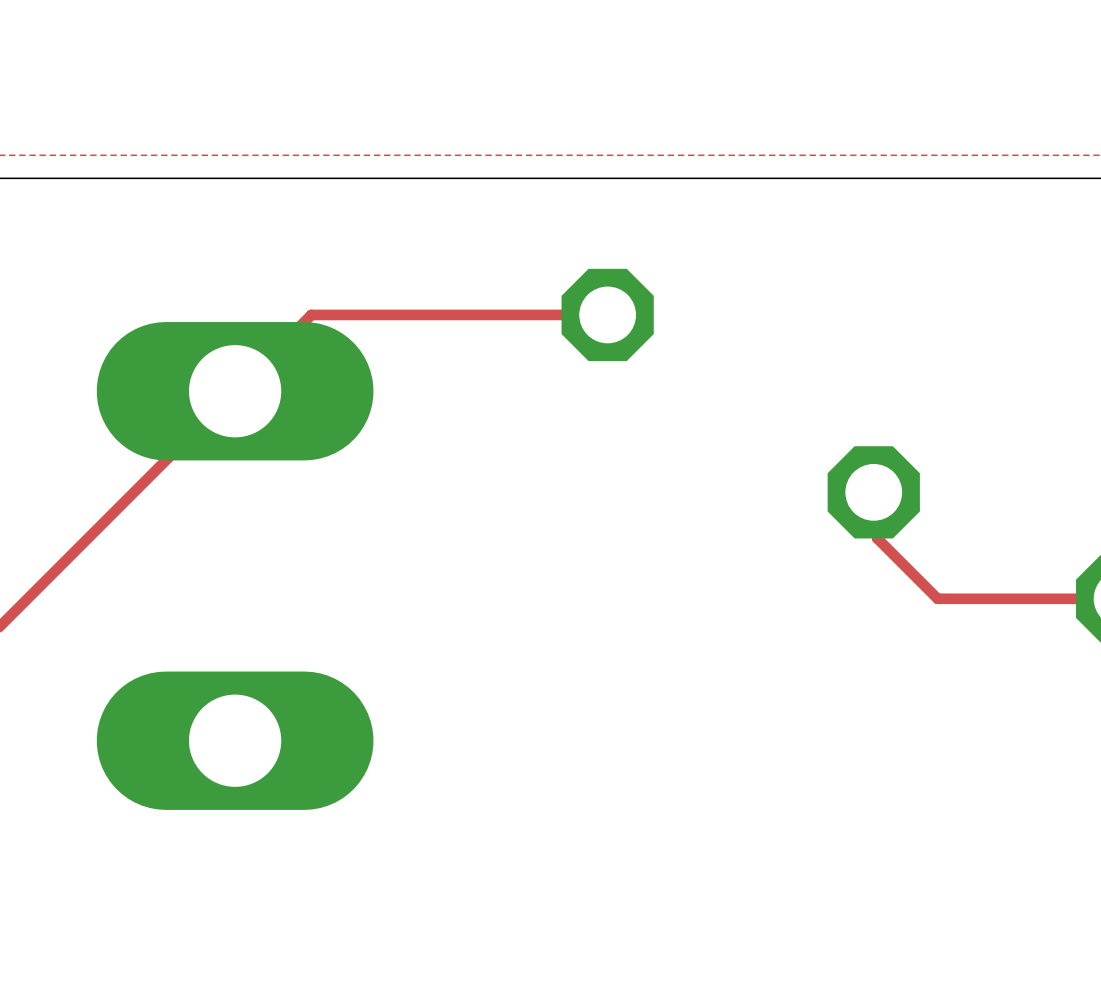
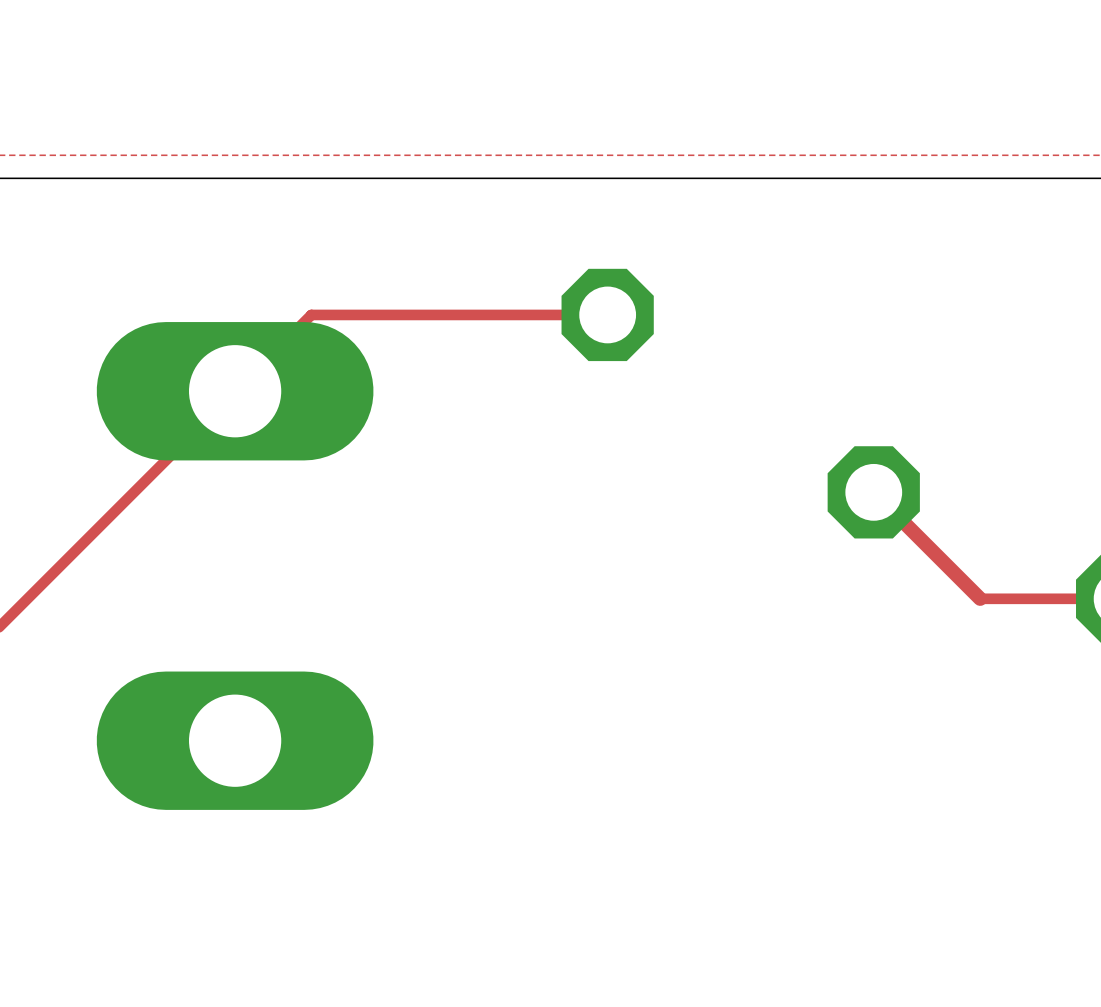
top track: (873, 492) (877, 492) (877, 538) (937, 598) (980, 598) -> (873, 492) (980, 598)

